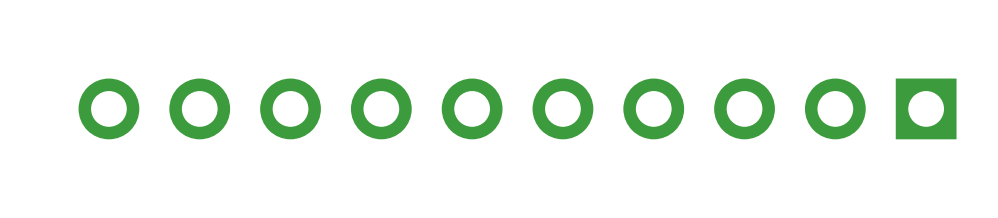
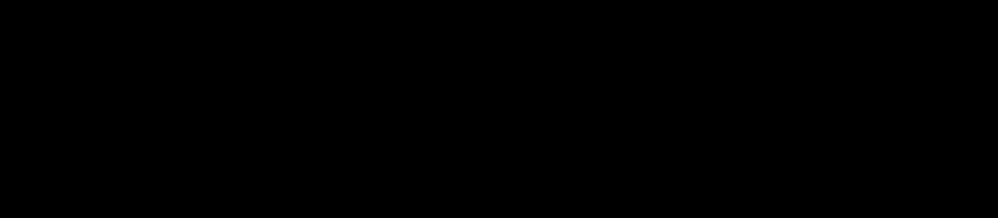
part: (517, 108) -> none

